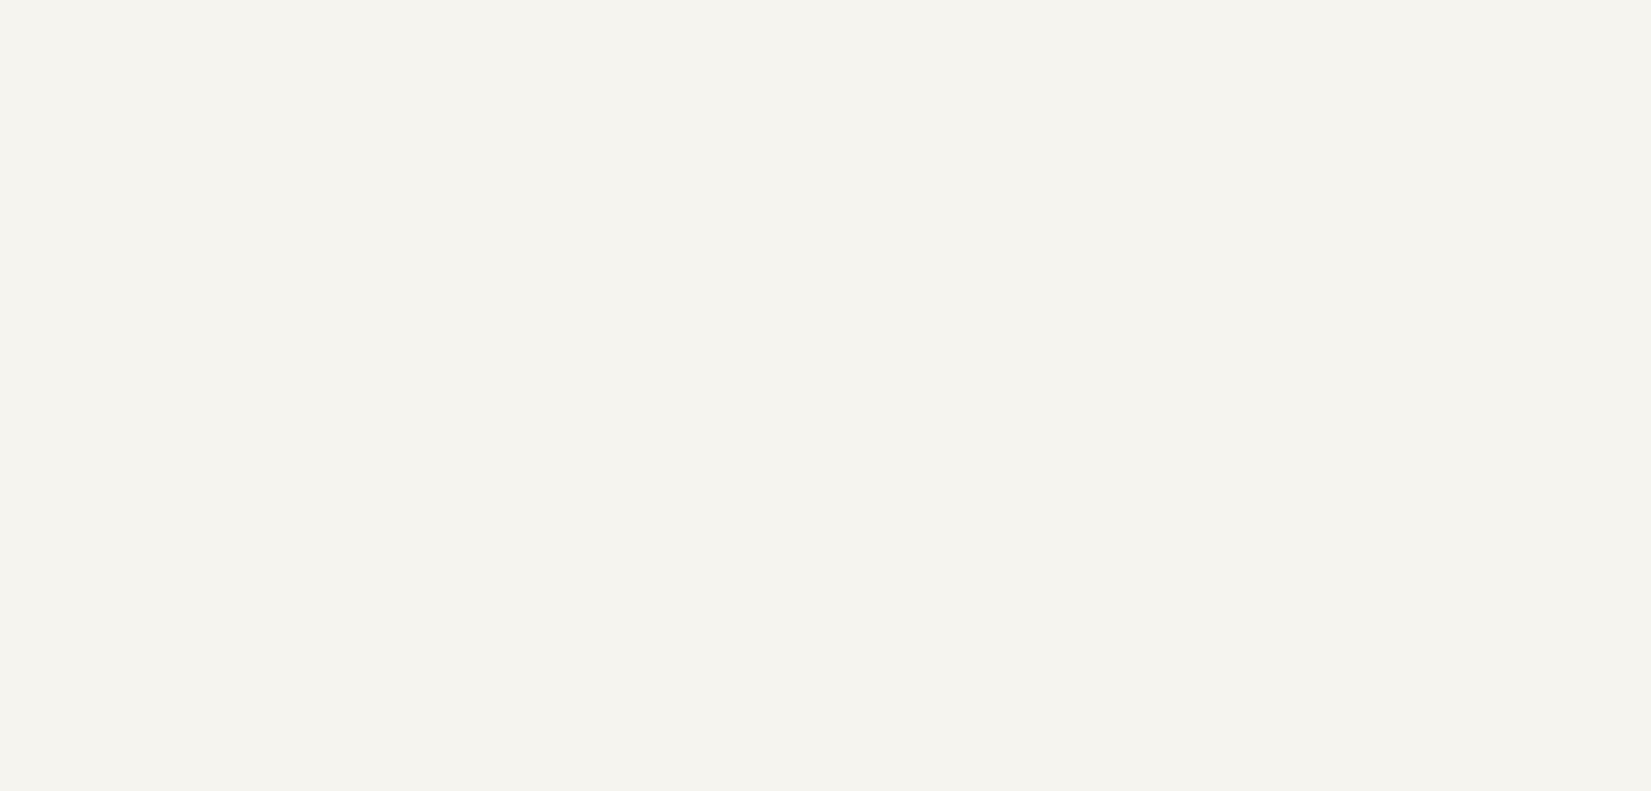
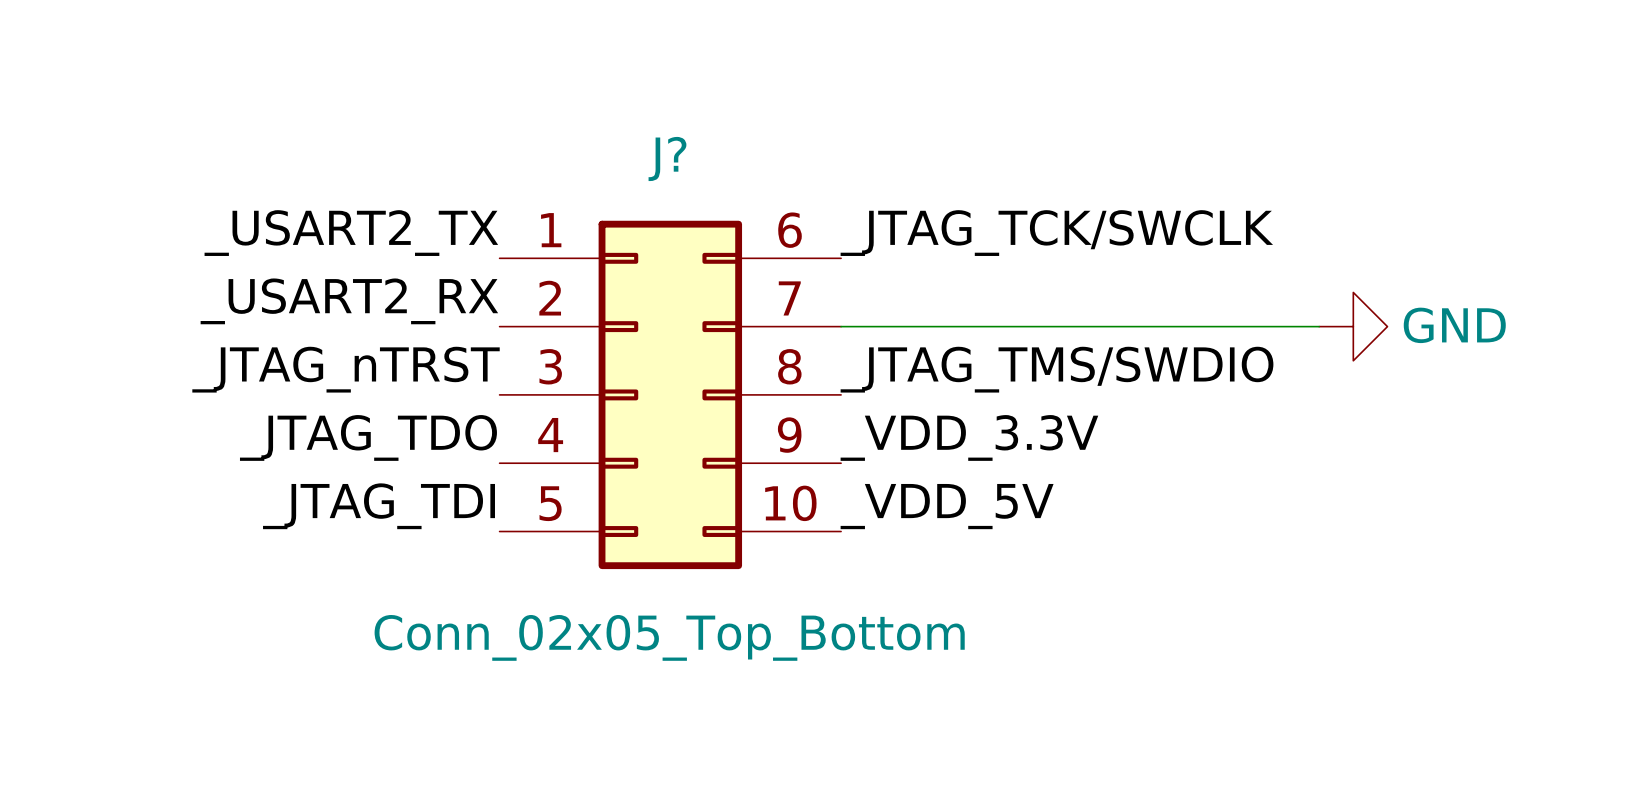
label: none -> _USART2_TX (351, 233)
label: none -> _JTAG_TCK/SWCLK (1056, 233)
label: none -> _USART2_RX (349, 301)
wire: none -> (841, 326) (1319, 326)
power symbol: none -> GND (1353, 326)
label: none -> _JTAG_nTRST (346, 369)
label: none -> _JTAG_TMS/SWDIO (1057, 369)
J?: none -> Conn_02x05_Top_Bottom (670, 394)
label: none -> _JTAG_TDO (368, 437)
label: none -> _VDD_3.3V (969, 437)
label: none -> _JTAG_TDI (379, 506)
label: none -> _VDD_5V (947, 506)

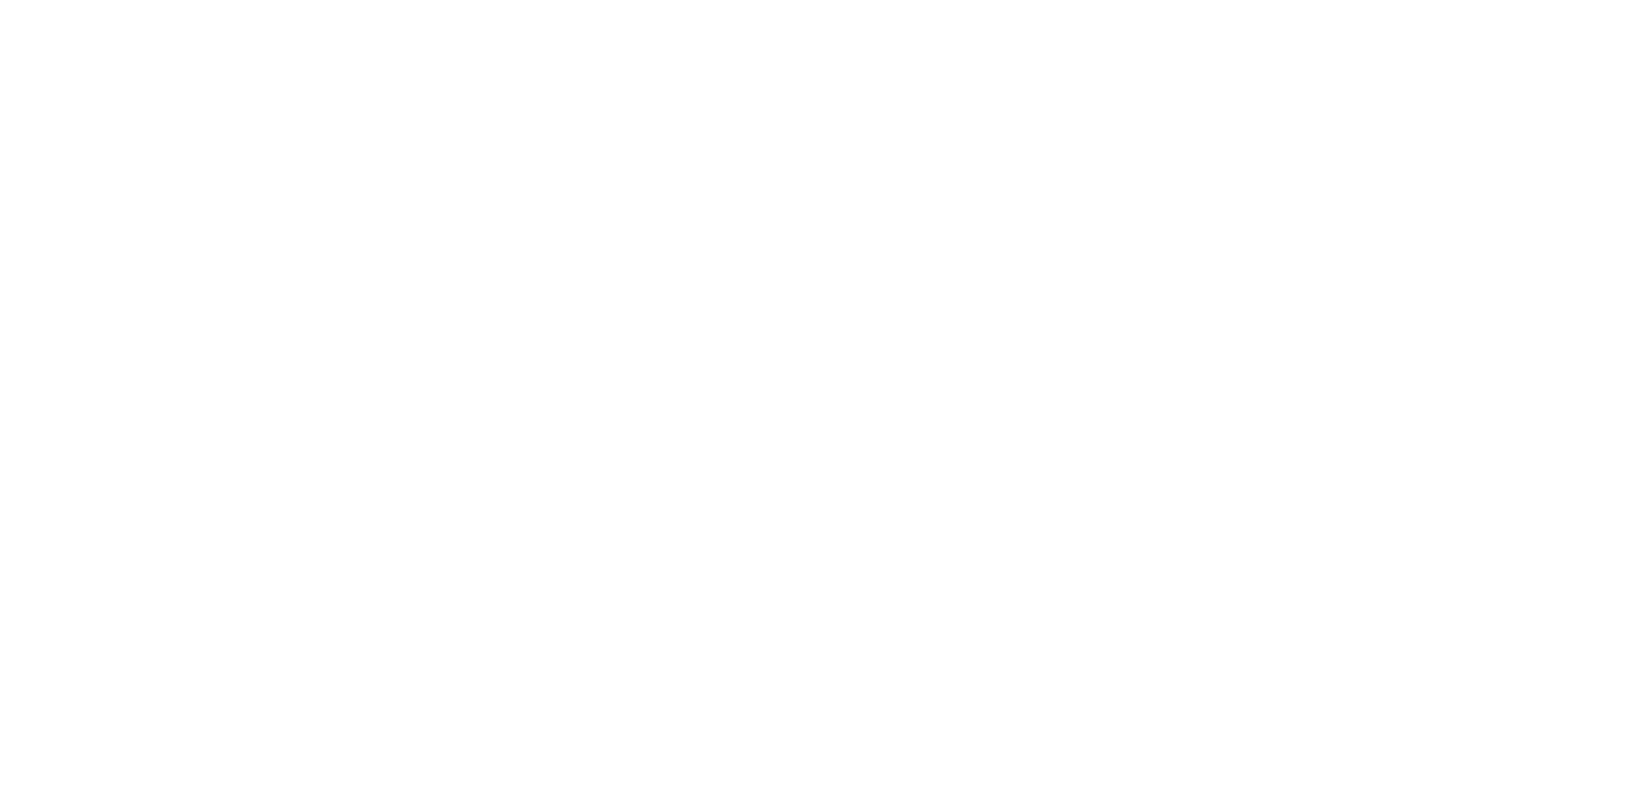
label: _USART2_TX (351, 233) -> none
label: _JTAG_TCK/SWCLK (1056, 233) -> none
label: _USART2_RX (349, 301) -> none
wire: (841, 326) (1319, 326) -> none
power symbol: GND (1353, 326) -> none
label: _JTAG_nTRST (346, 369) -> none
label: _JTAG_TMS/SWDIO (1057, 369) -> none
J?: Conn_02x05_Top_Bottom (670, 394) -> none
label: _JTAG_TDO (368, 437) -> none
label: _VDD_3.3V (969, 437) -> none
label: _JTAG_TDI (379, 506) -> none
label: _VDD_5V (947, 506) -> none

